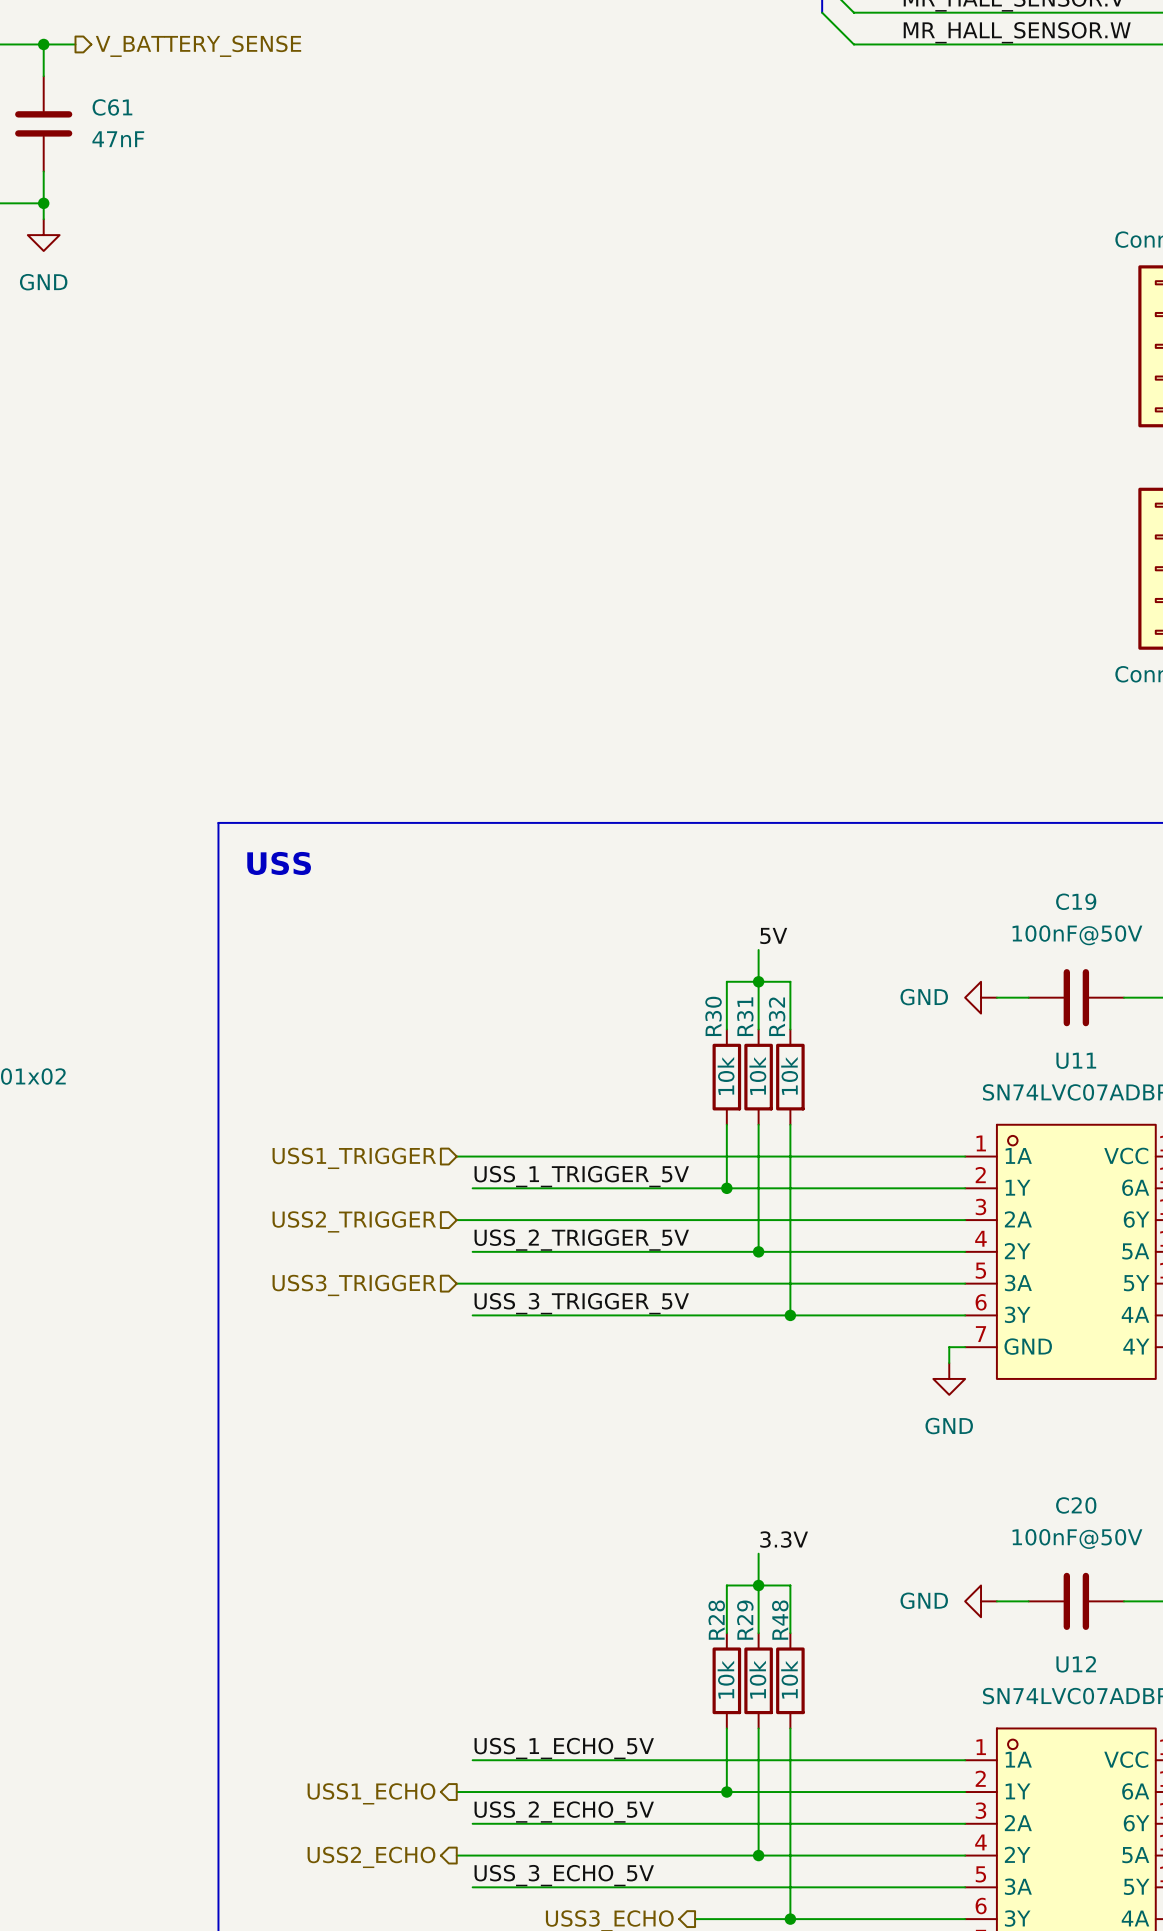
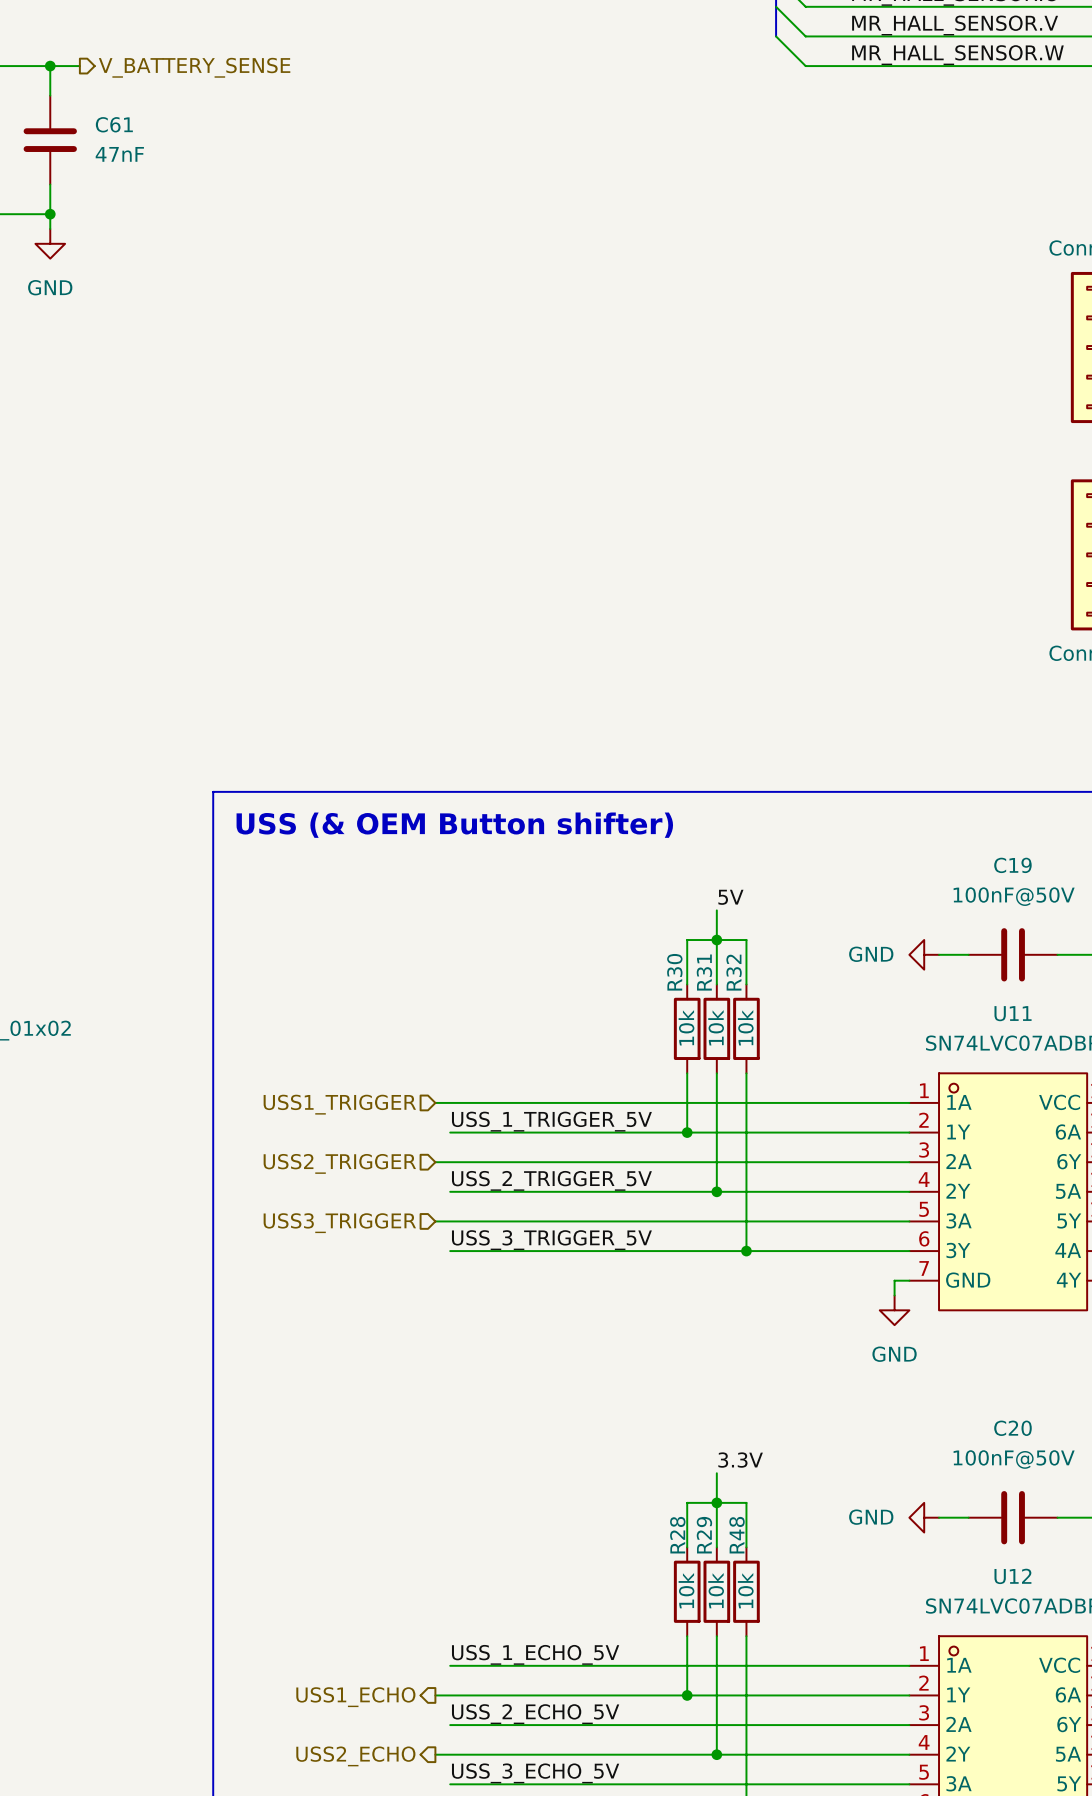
text: none -> USS (& OEM Button shifter) (454, 825)
text: USS (279, 863) -> none

